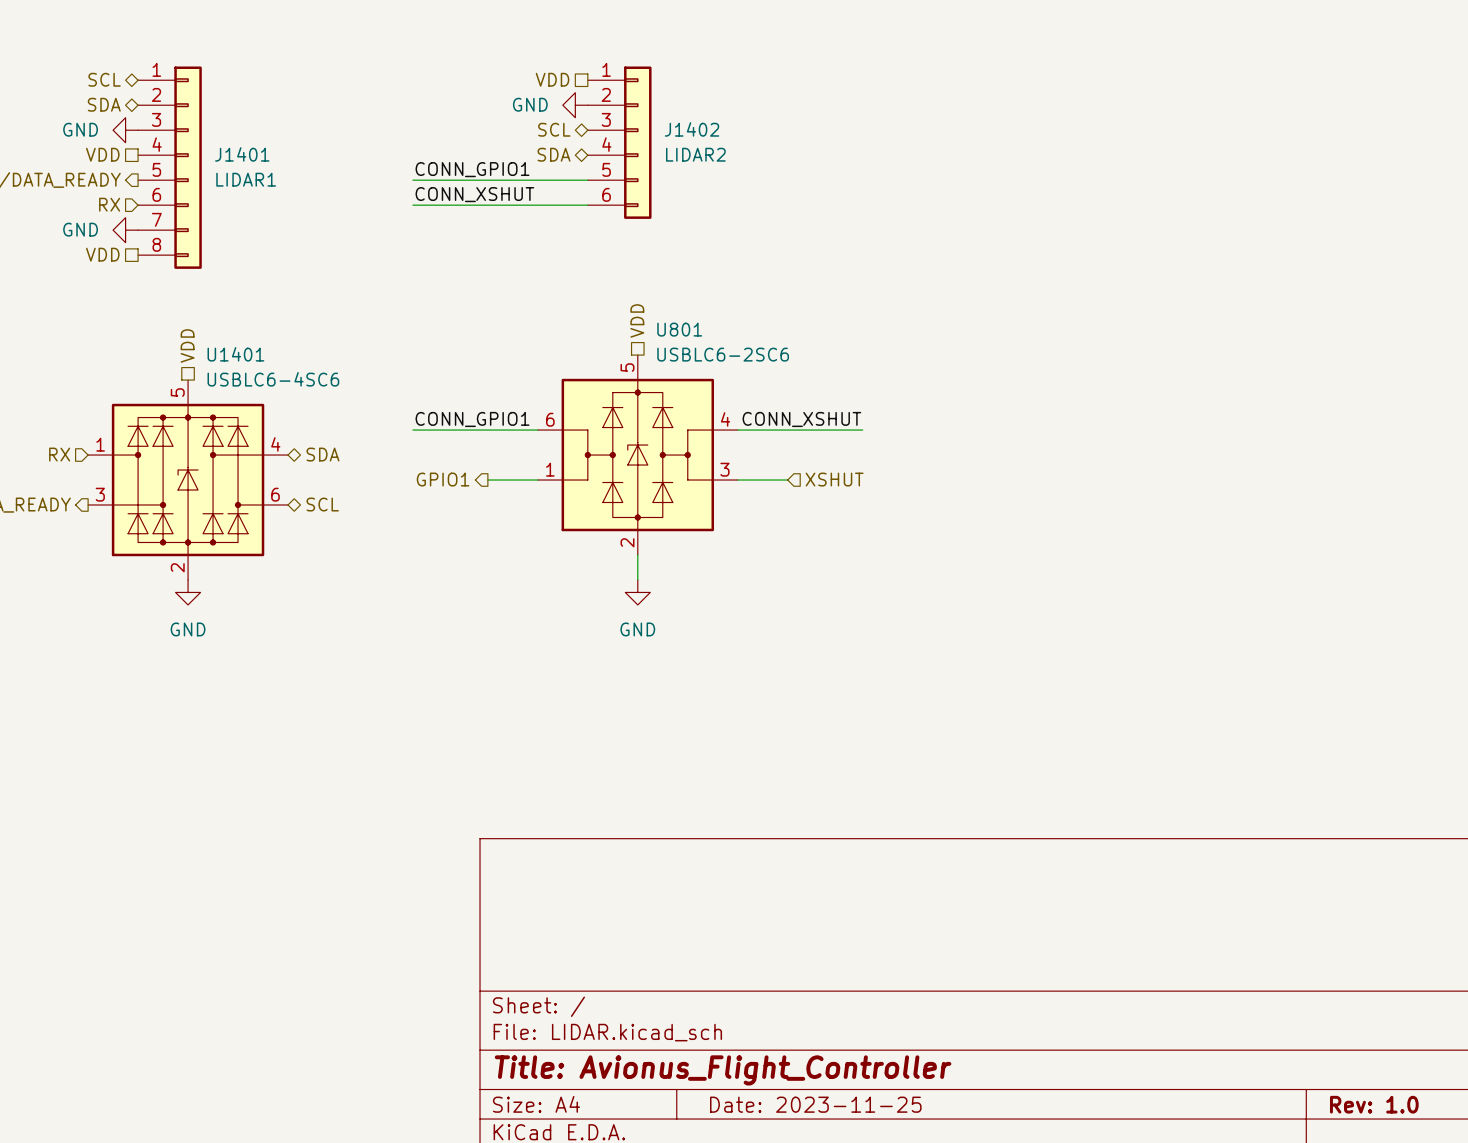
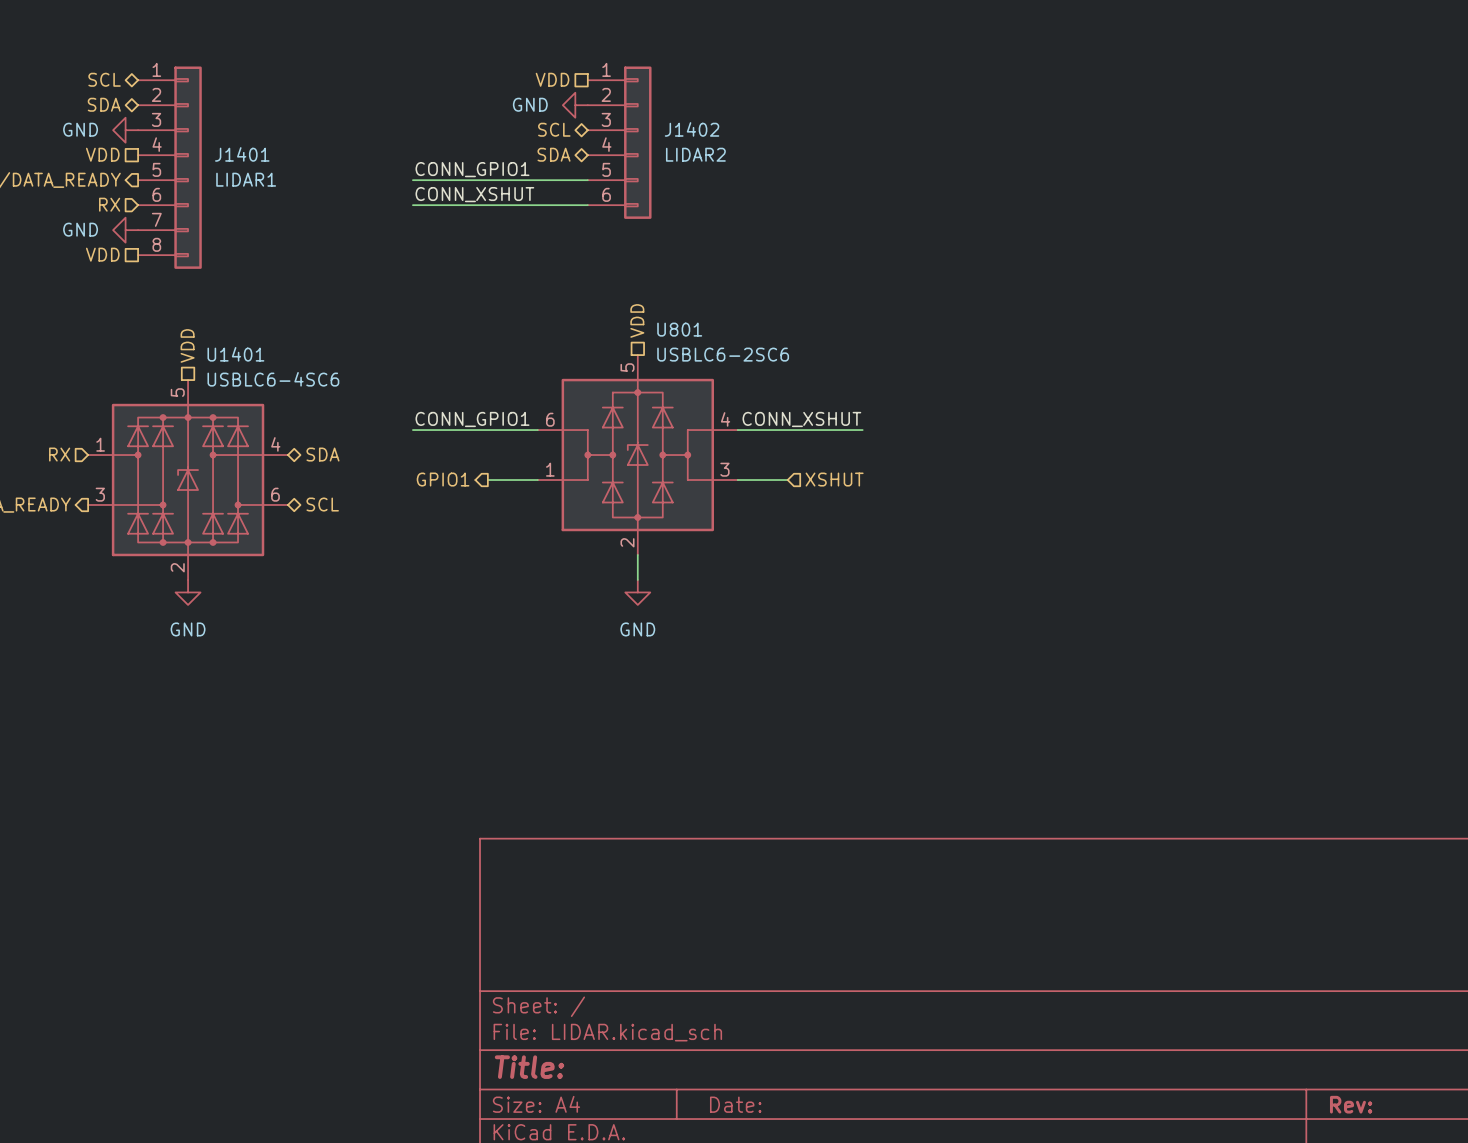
title block: Title: Avionus_Flight_Controller (723, 1070) -> Title: (529, 1067)
title block: Date: 2023-11-25 (815, 1104) -> Date: (735, 1104)
title block: Rev: 1.0 (1374, 1104) -> Rev: (1351, 1104)

